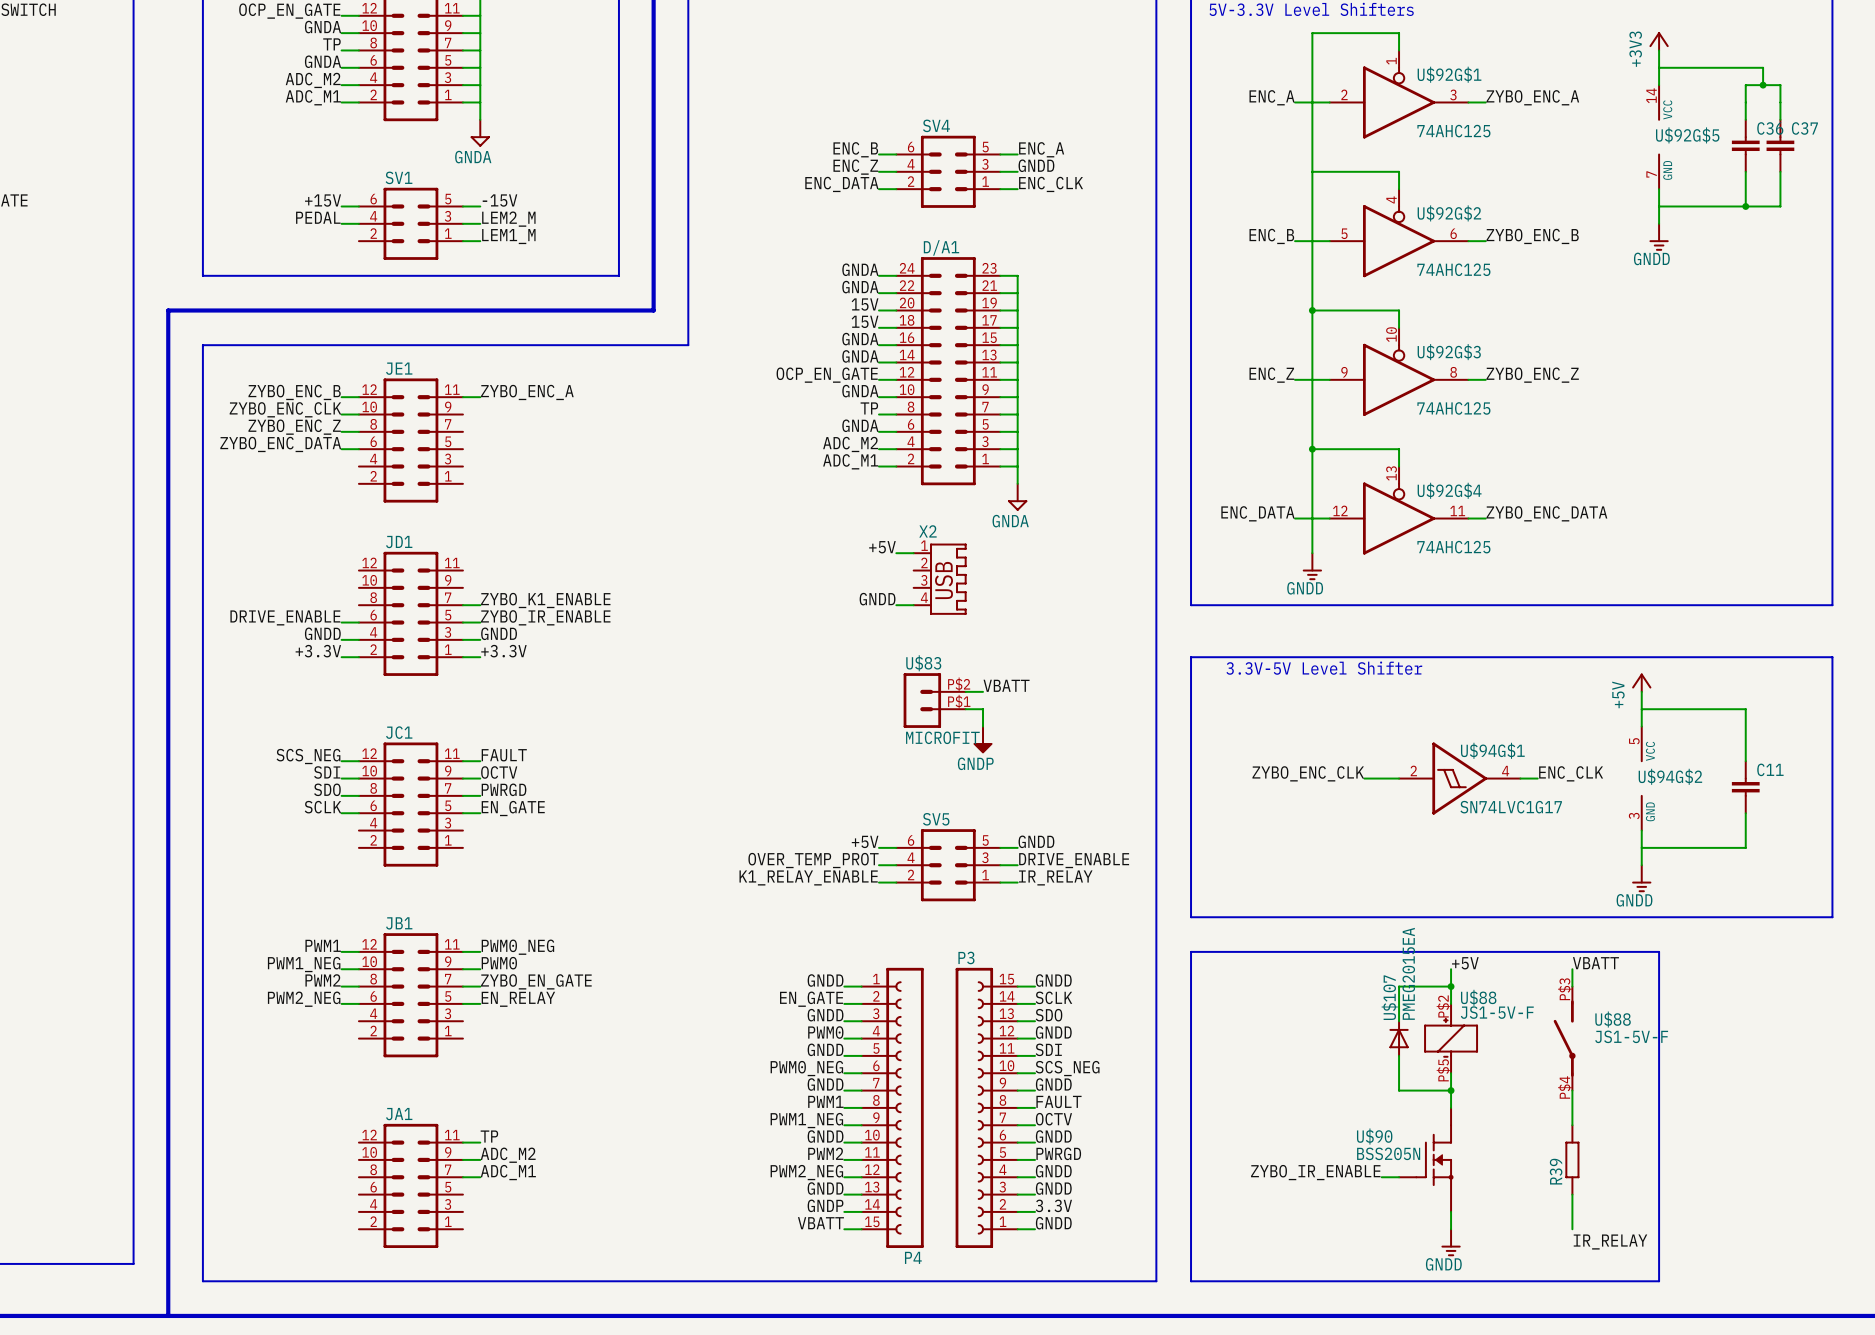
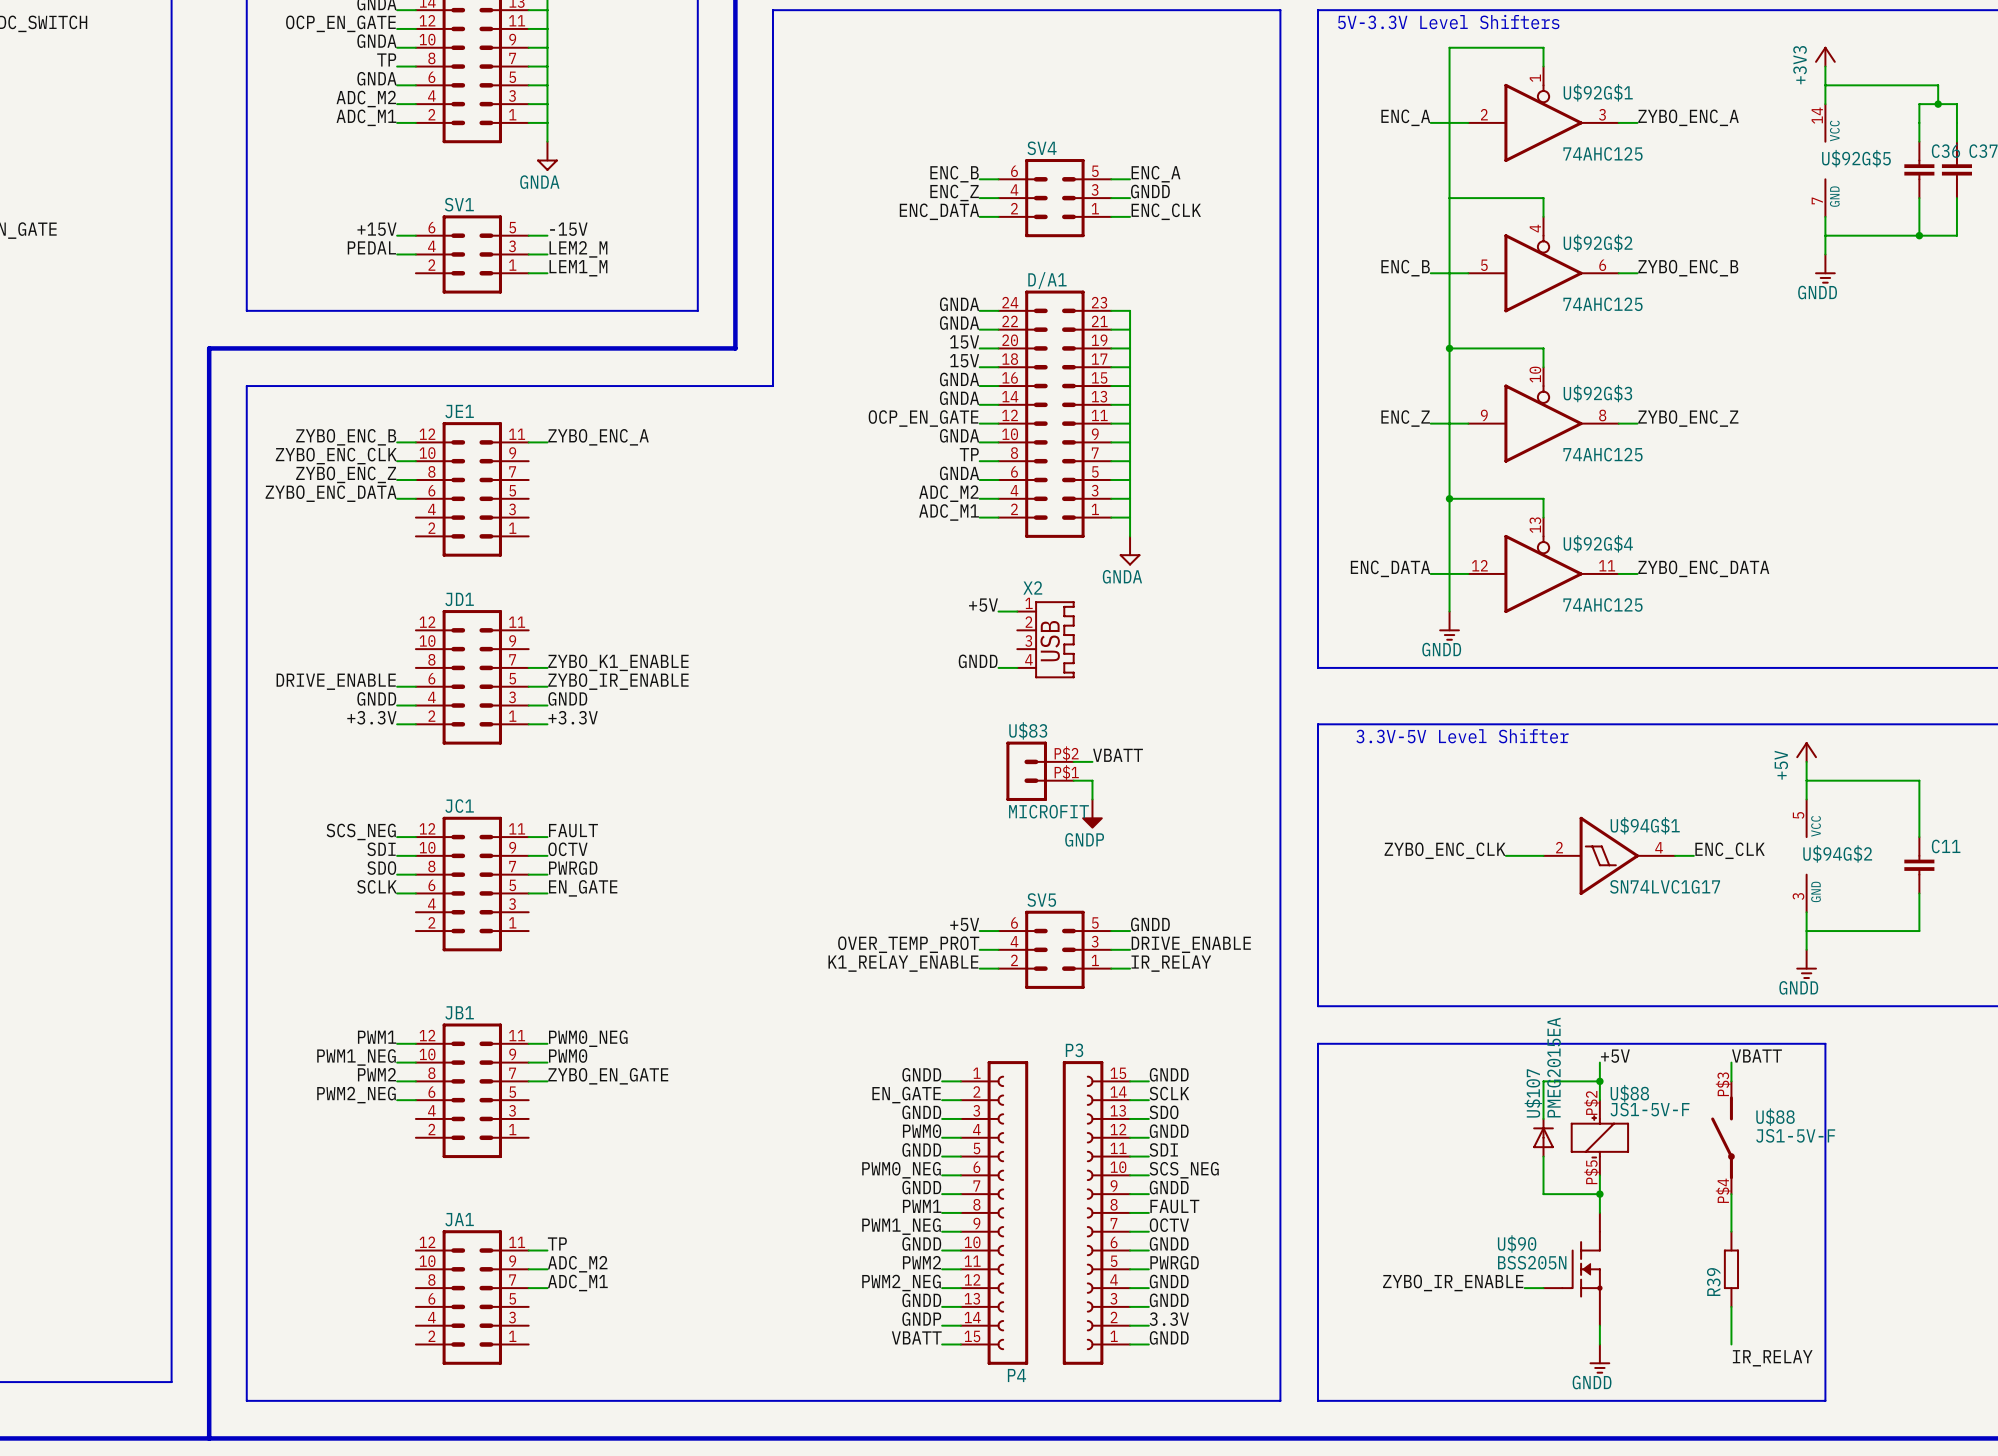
label: EN_RELAY (518, 999) -> none
wire: (462, 1003) (480, 1003) -> none

